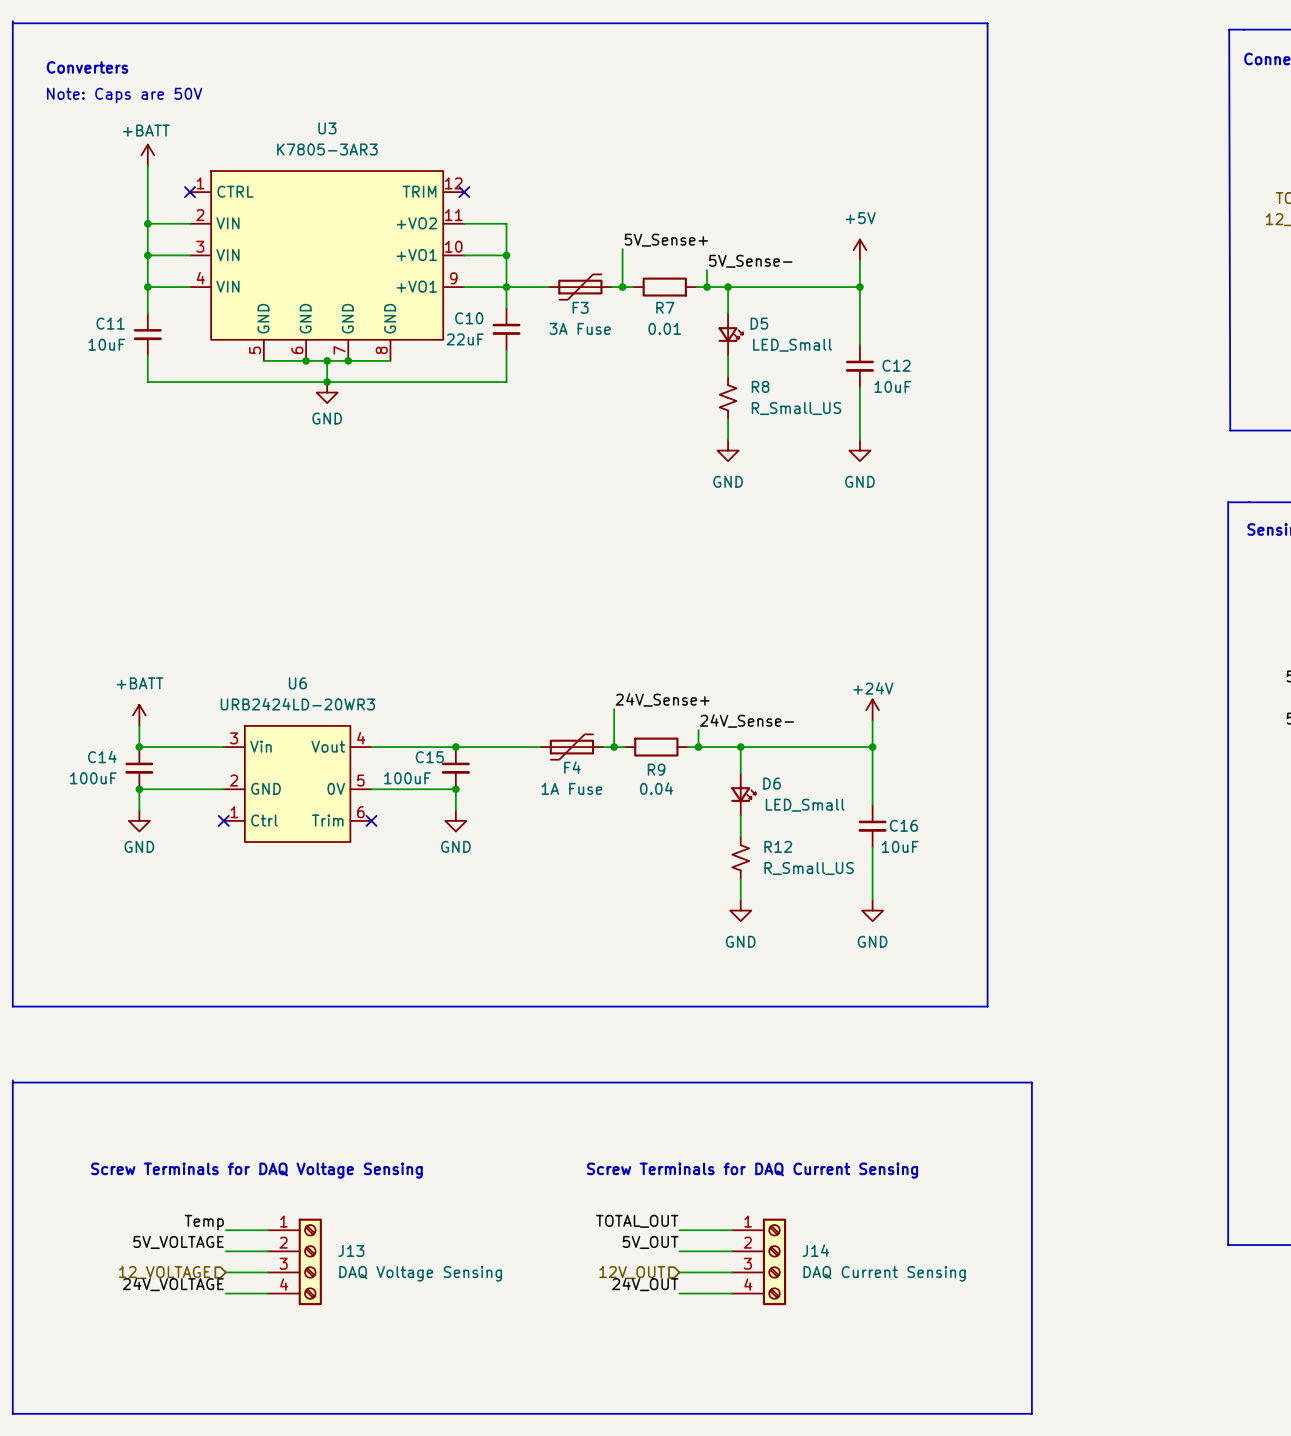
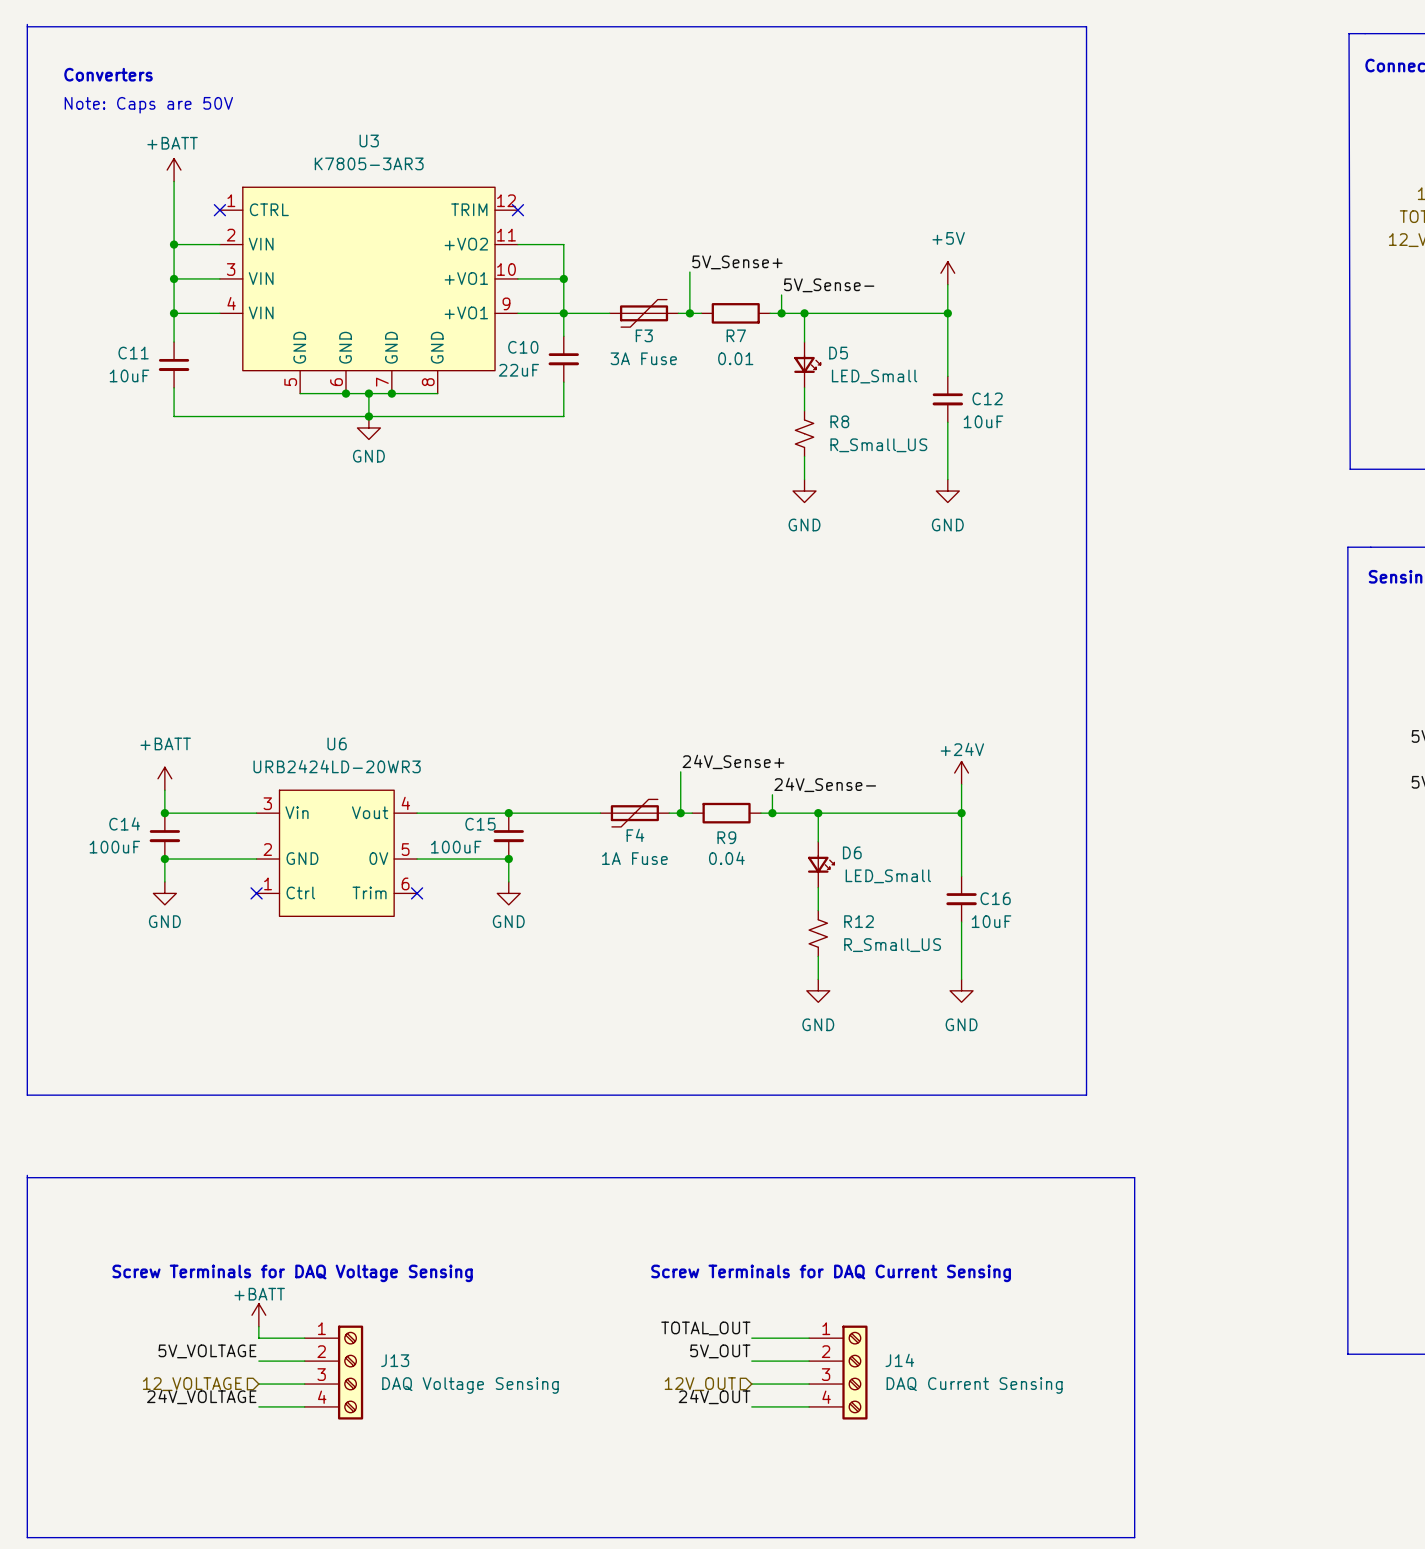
power symbol: none -> +BATT (258, 1315)
wire: none -> (258, 1326) (258, 1338)
label: Temp (204, 1222) -> none

